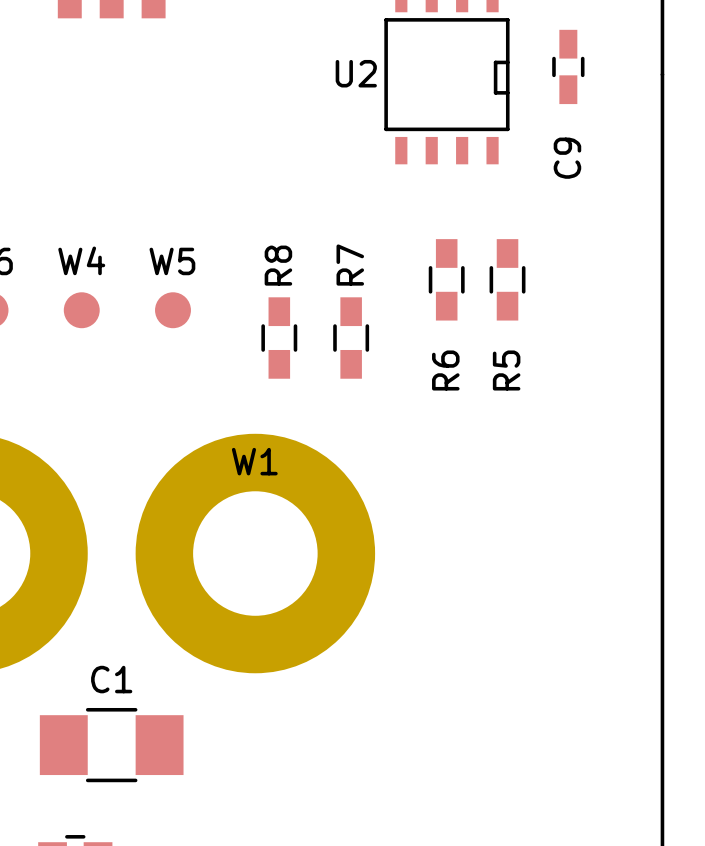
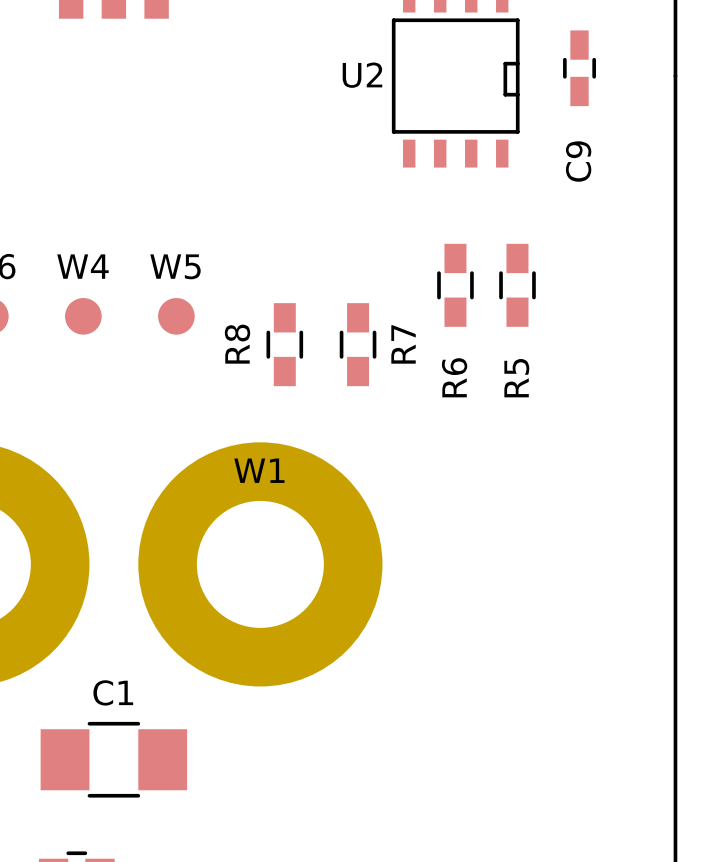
R8 name position: R8 (278, 265) -> R8 (237, 344)
R7 name position: R7 (350, 265) -> R7 (403, 344)

